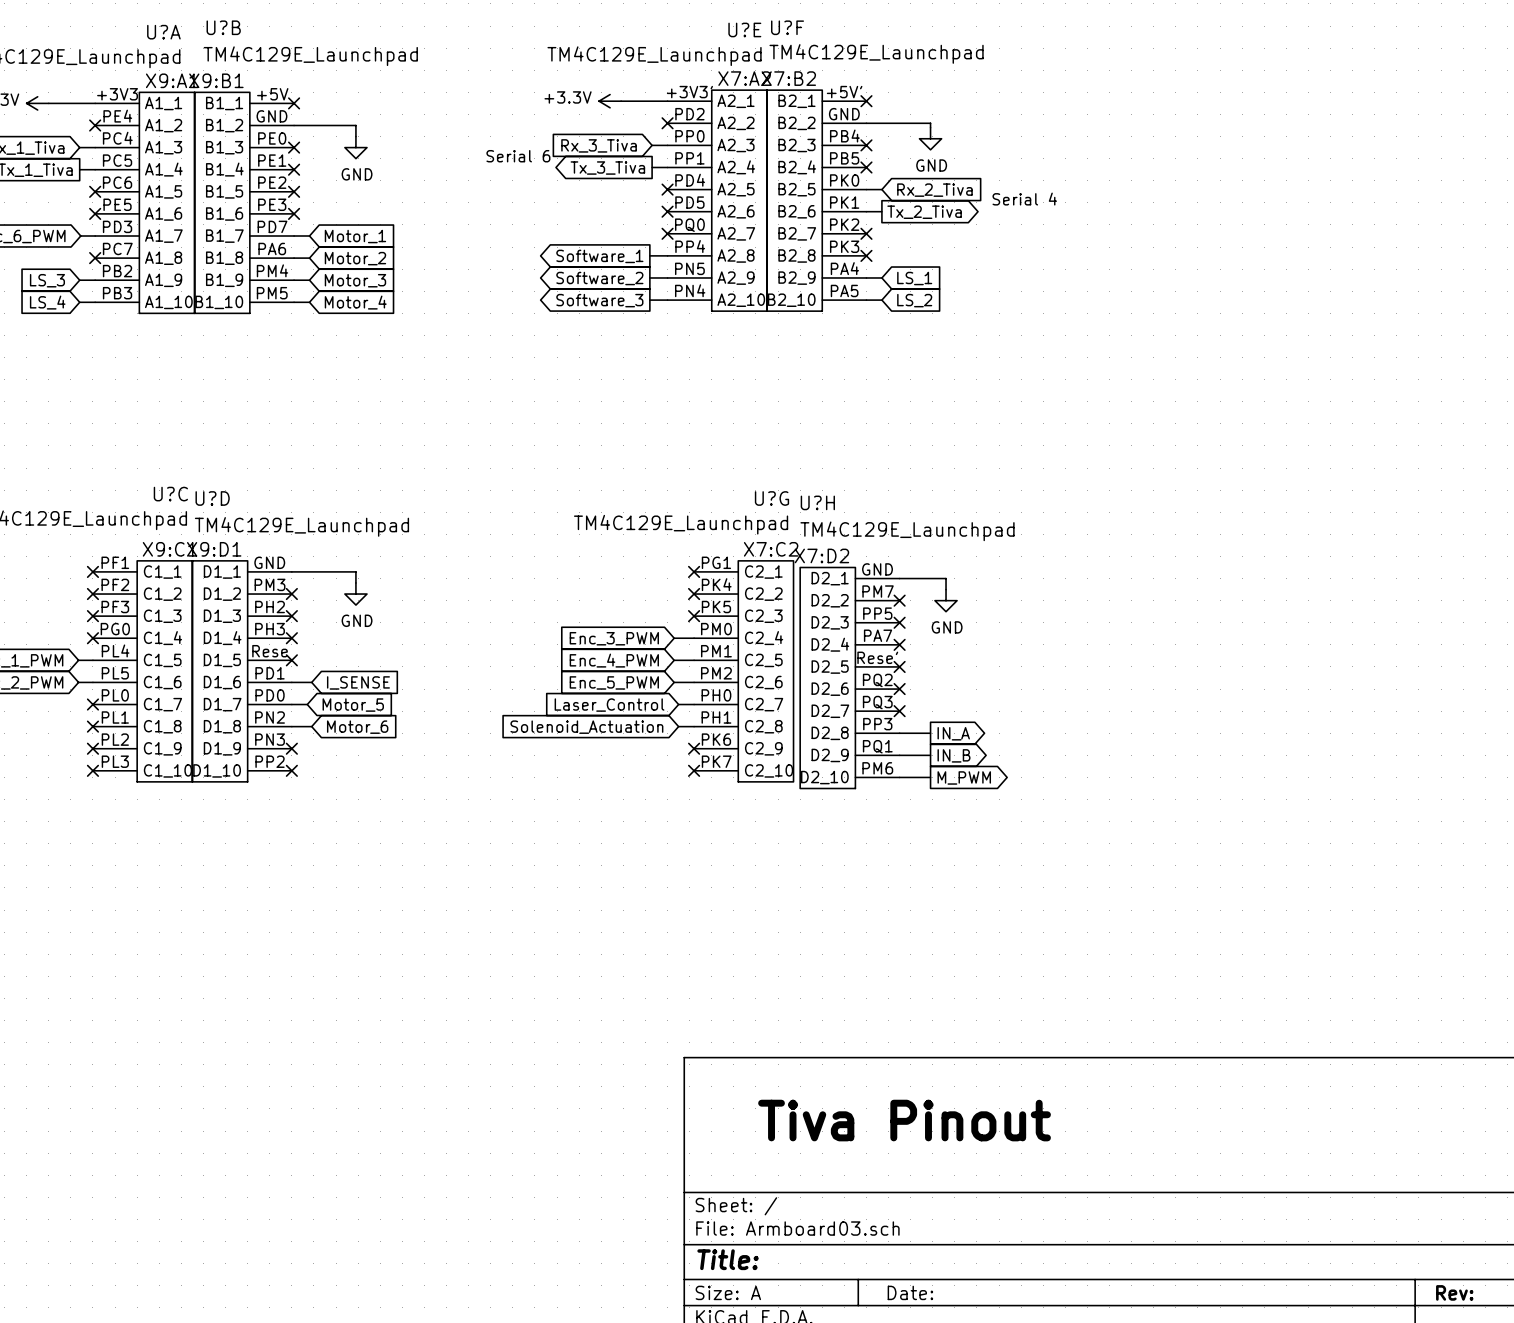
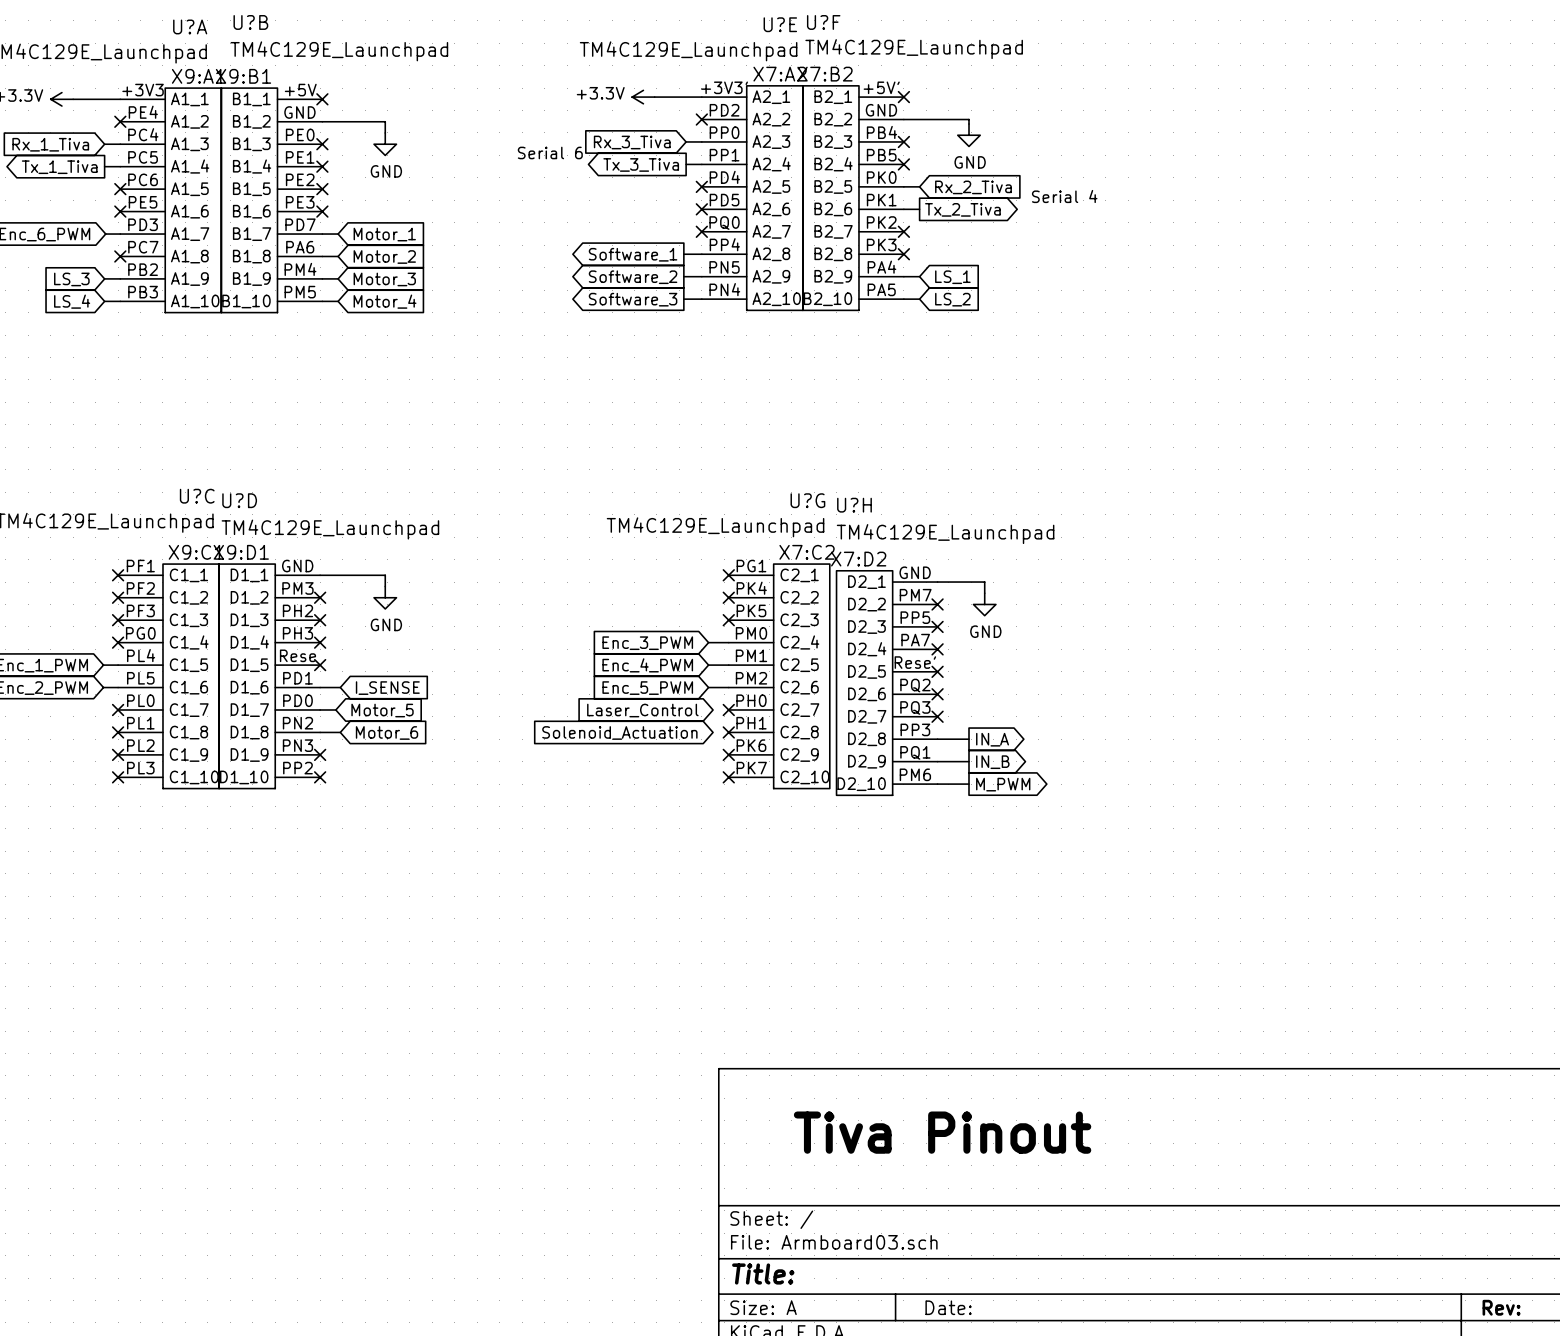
wire: (678, 704) (694, 704) -> none
no-connect mark: none -> (728, 709)
wire: (678, 726) (694, 726) -> none
no-connect mark: none -> (728, 732)

